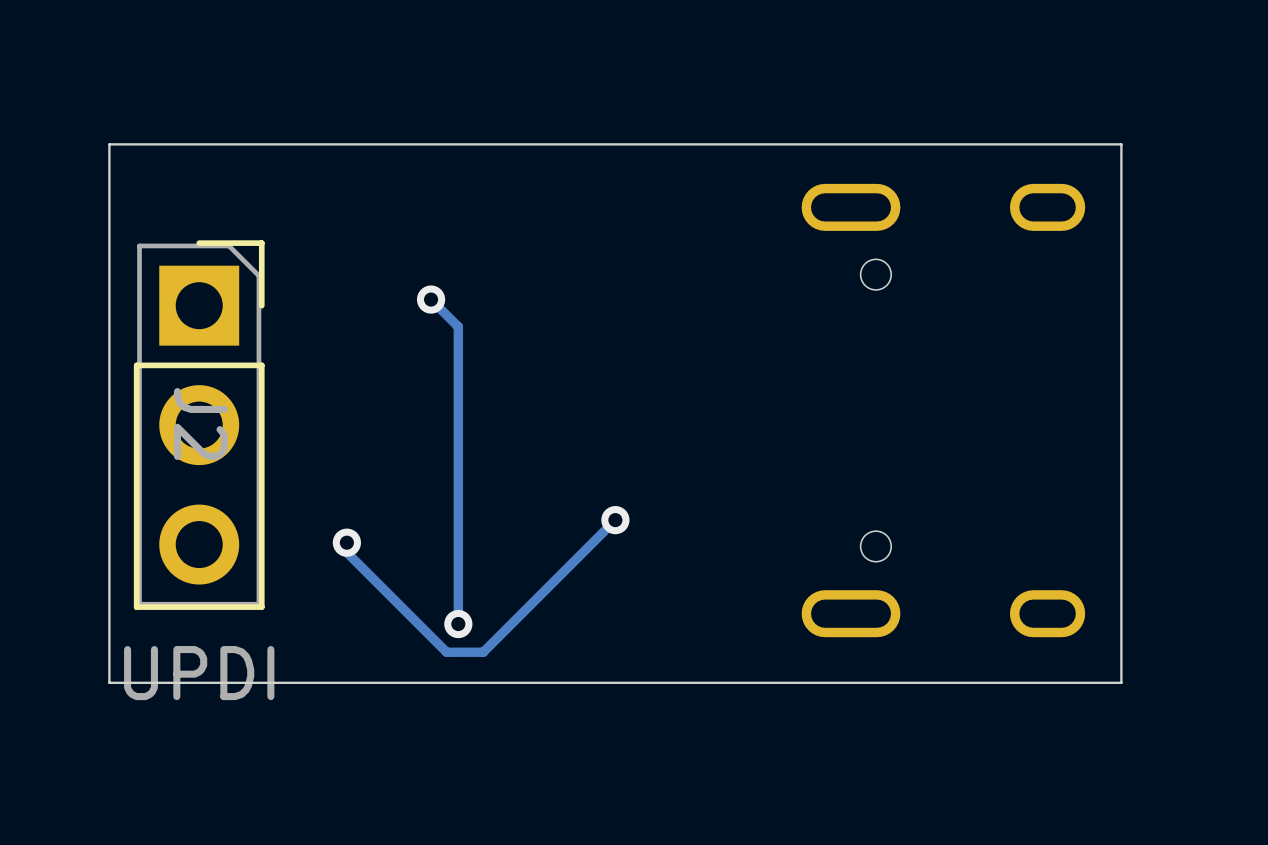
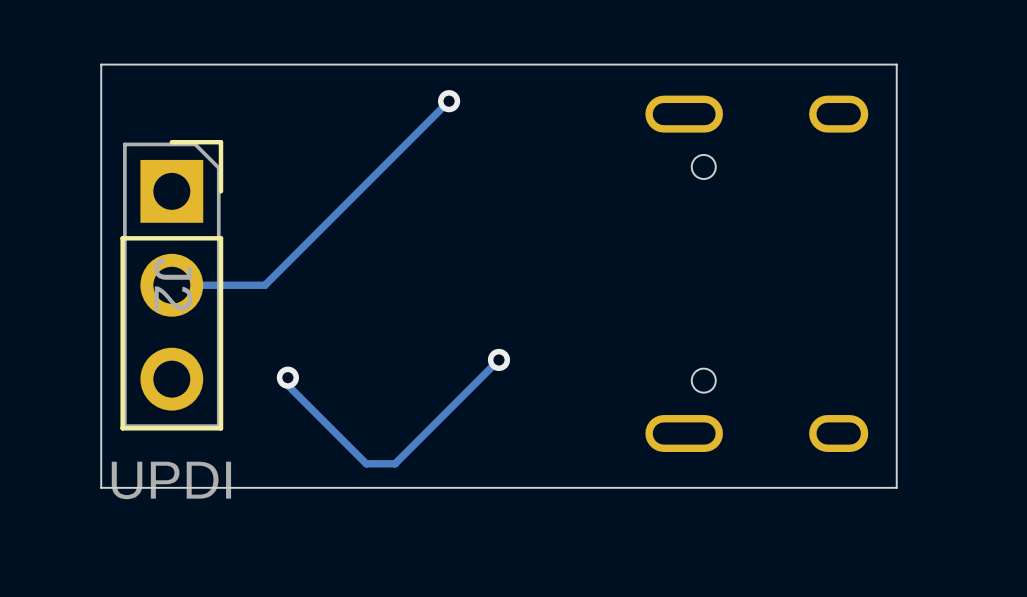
track: none -> (449, 101) (264, 285) (171, 285)
track: (431, 299) (458, 326) (458, 624) -> none
via position: (431, 299) -> (449, 101)
via: (458, 624) -> none

